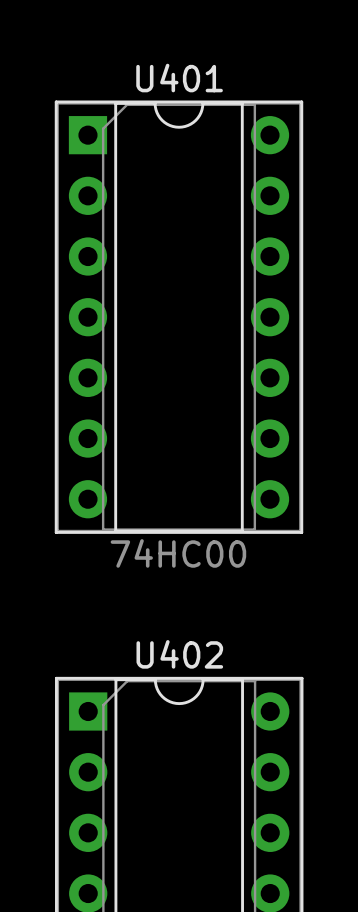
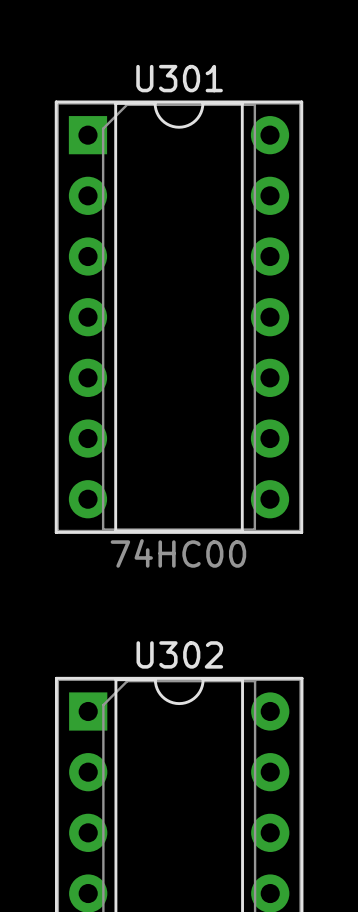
U401 name: U401 (179, 78) -> U301 (179, 78)
U402 name: U402 (179, 654) -> U302 (179, 654)

